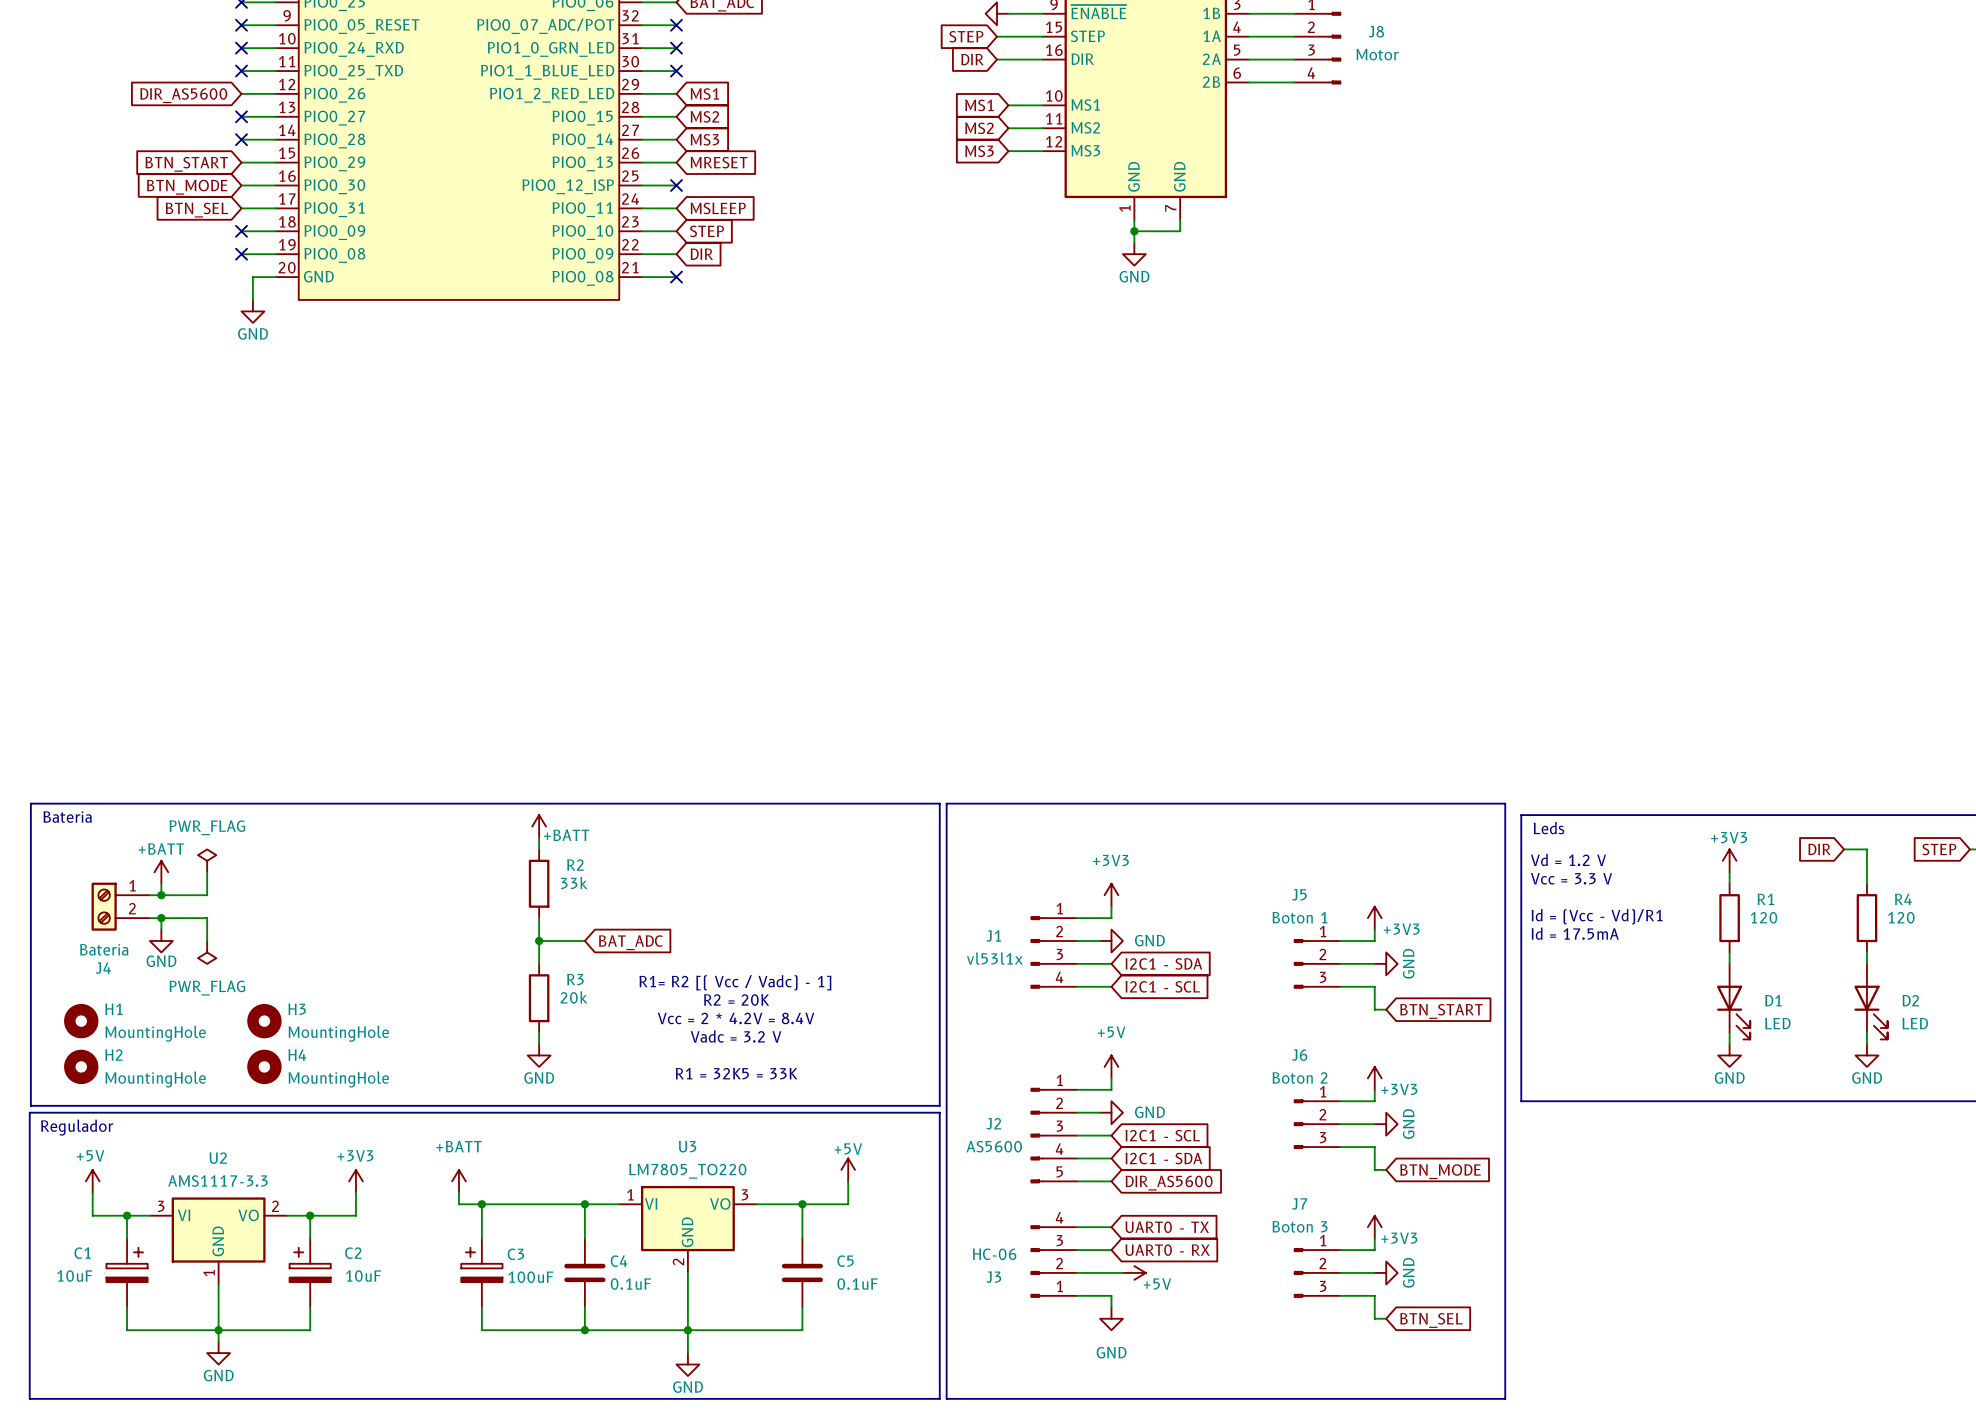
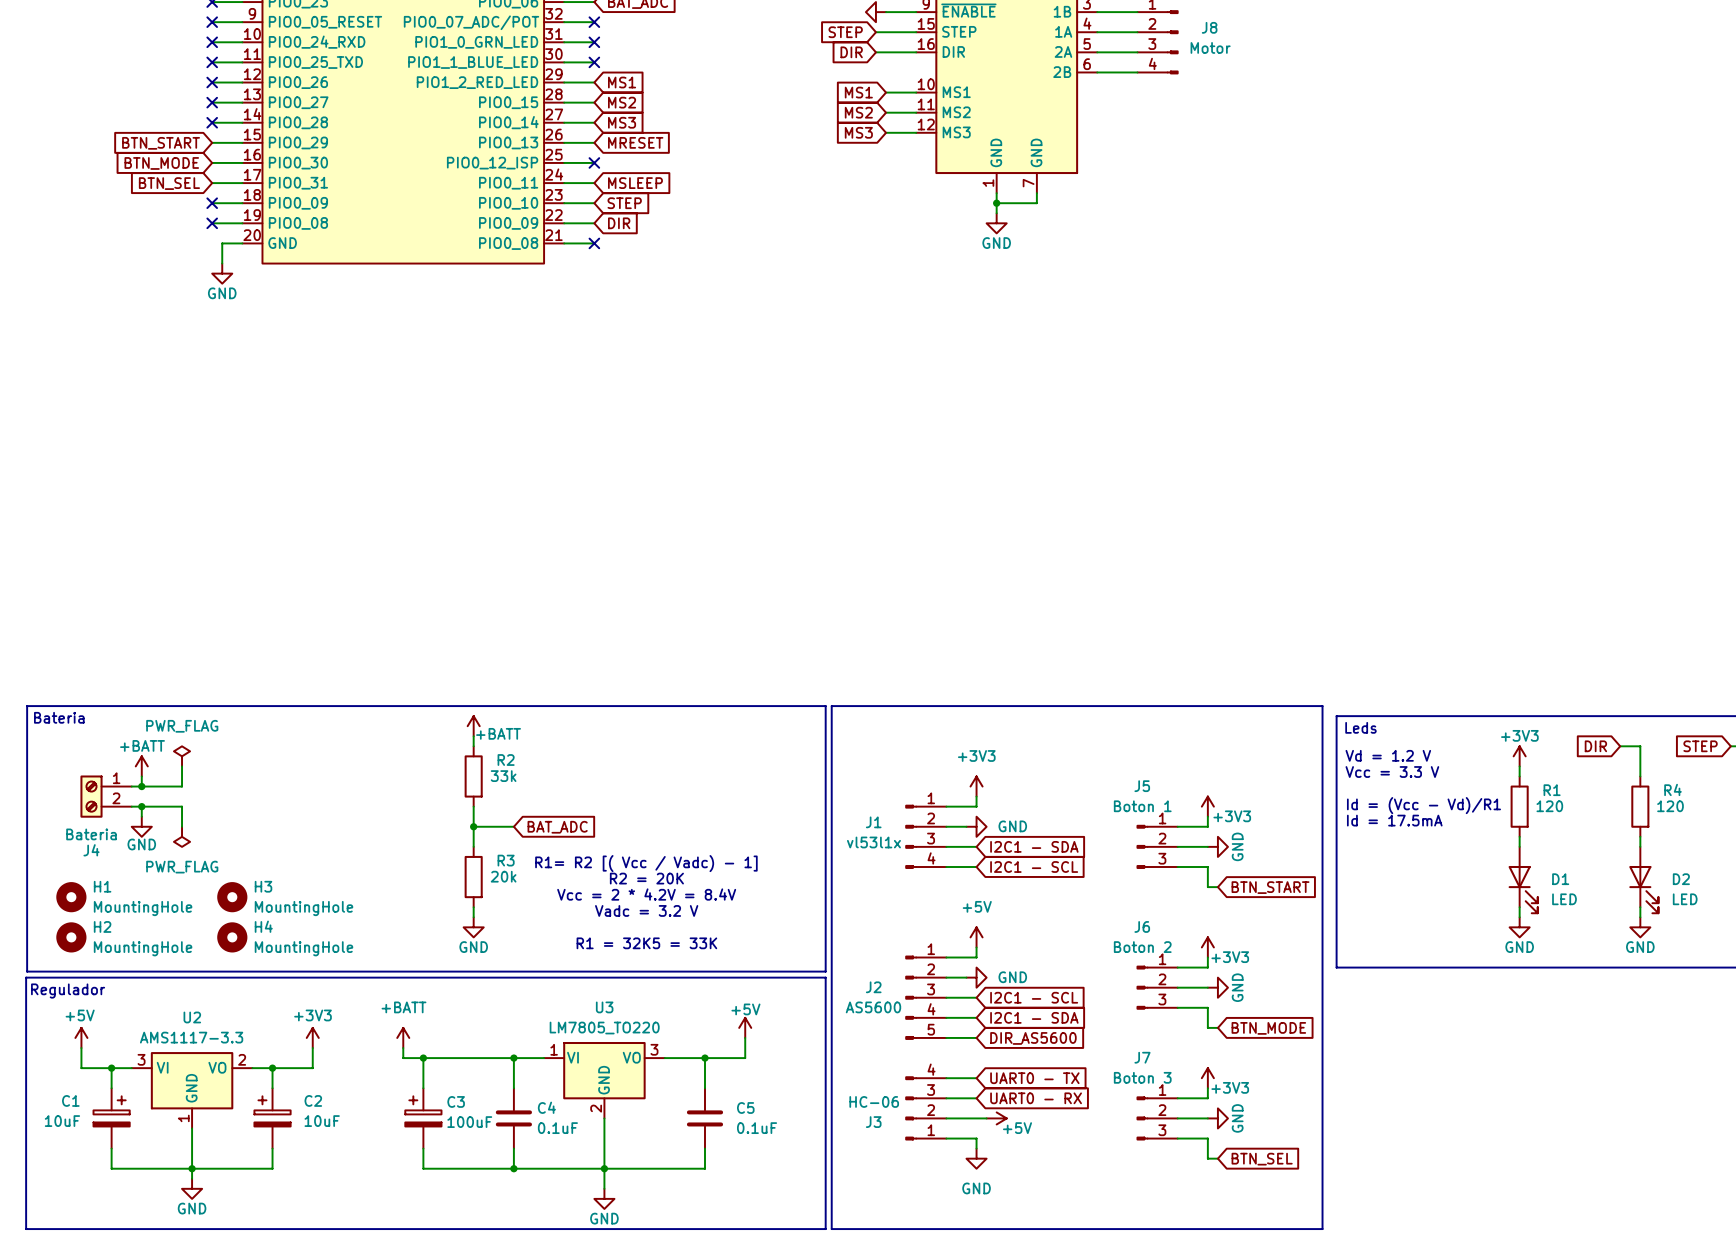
no-connect mark: none -> (212, 82)
global label: DIR_AS5600 (183, 95) -> none

